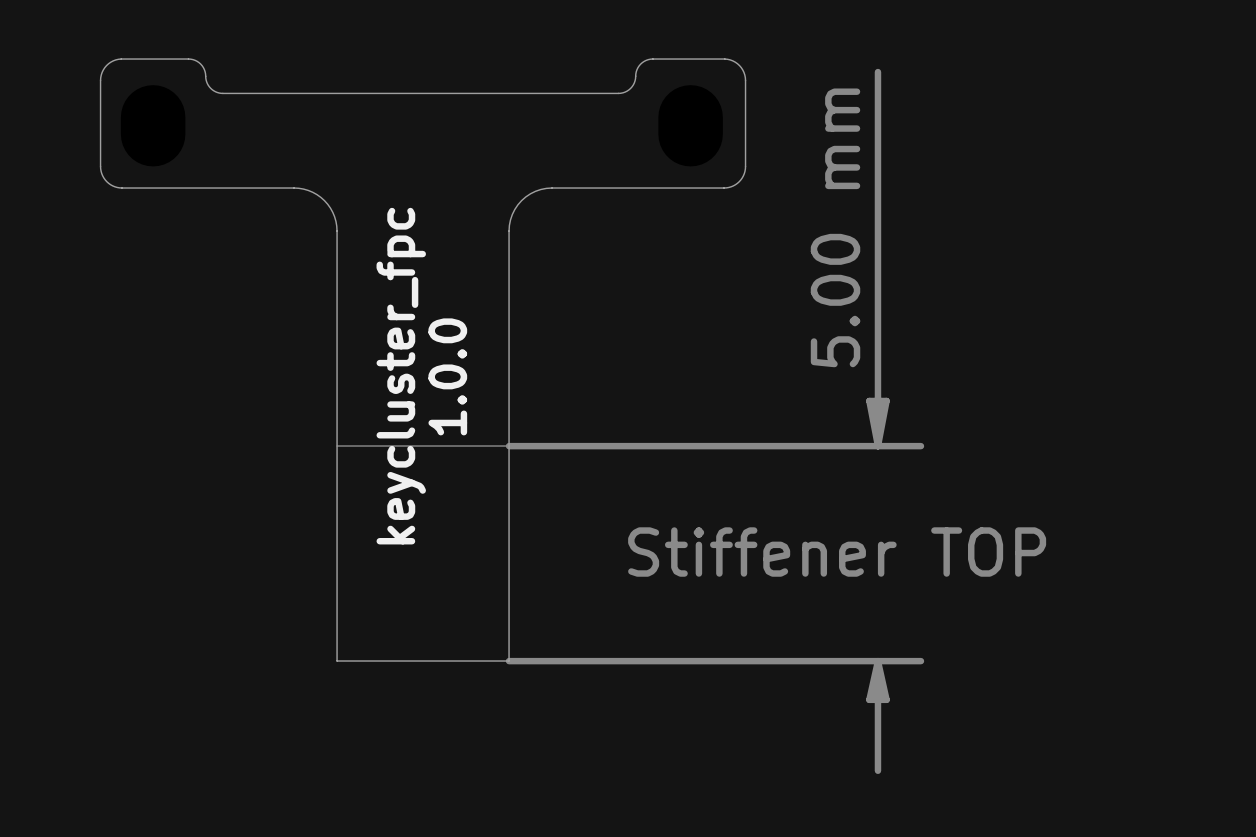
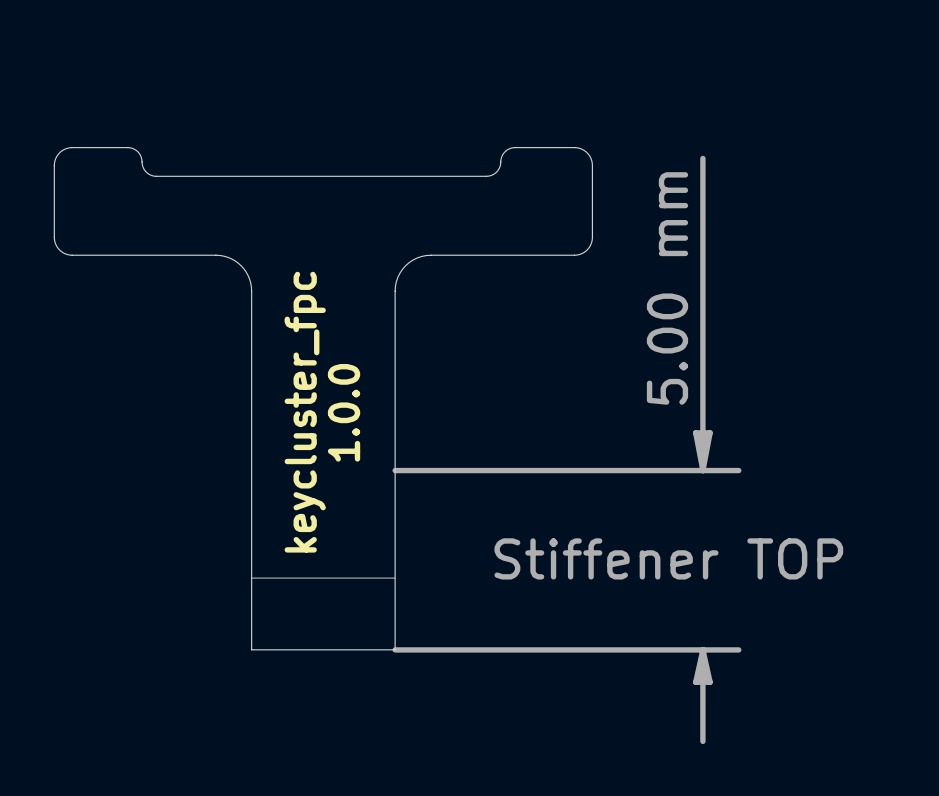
line: (337, 446) (509, 446) -> (251, 578) (395, 578)

